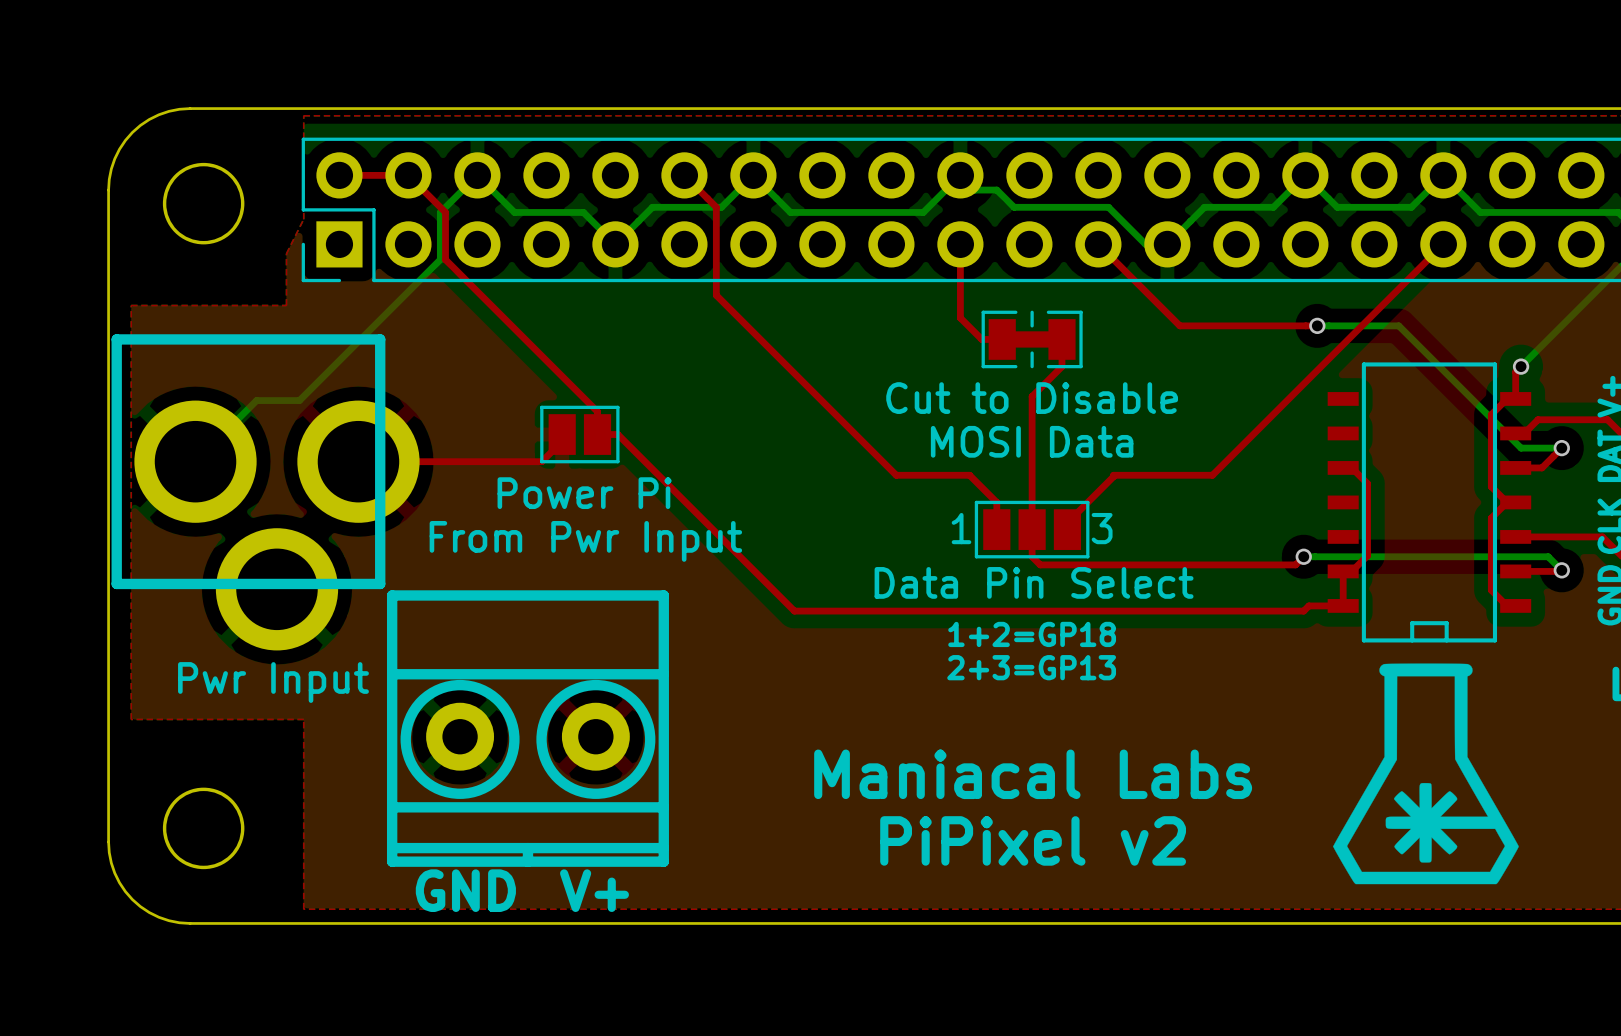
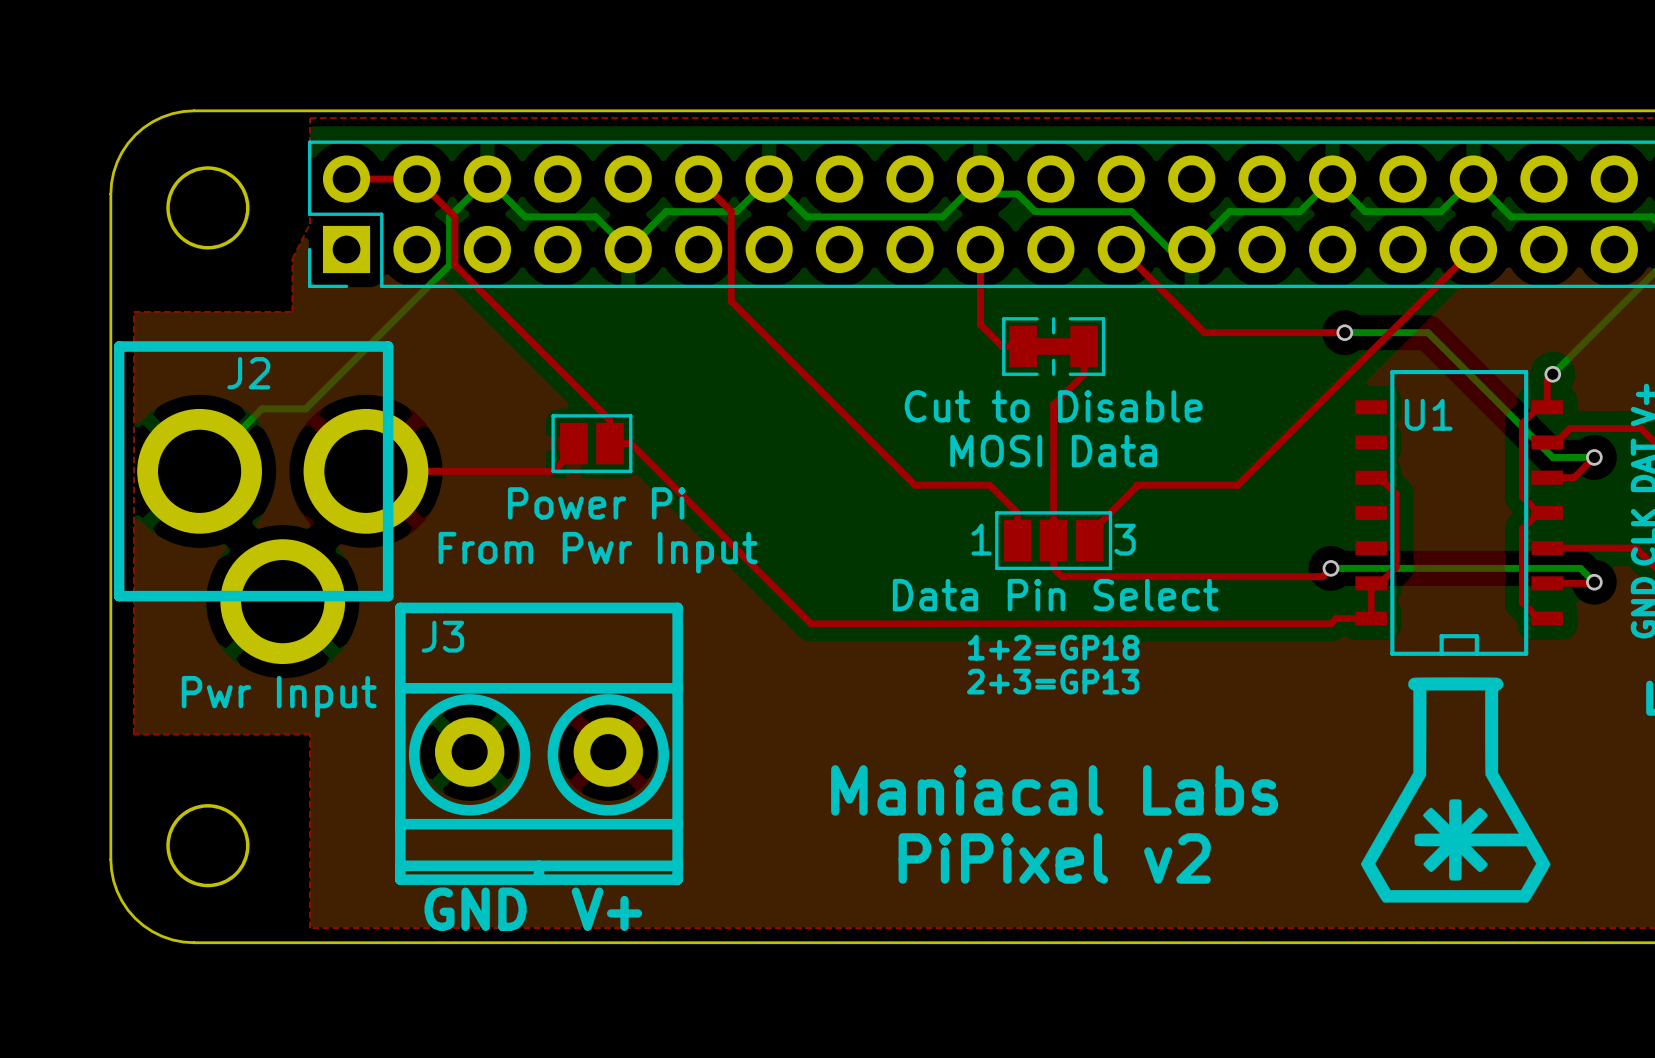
J2 name: none -> J2 (248, 373)
U1 name: none -> U1 (1428, 414)
J3 name: none -> J3 (442, 636)

